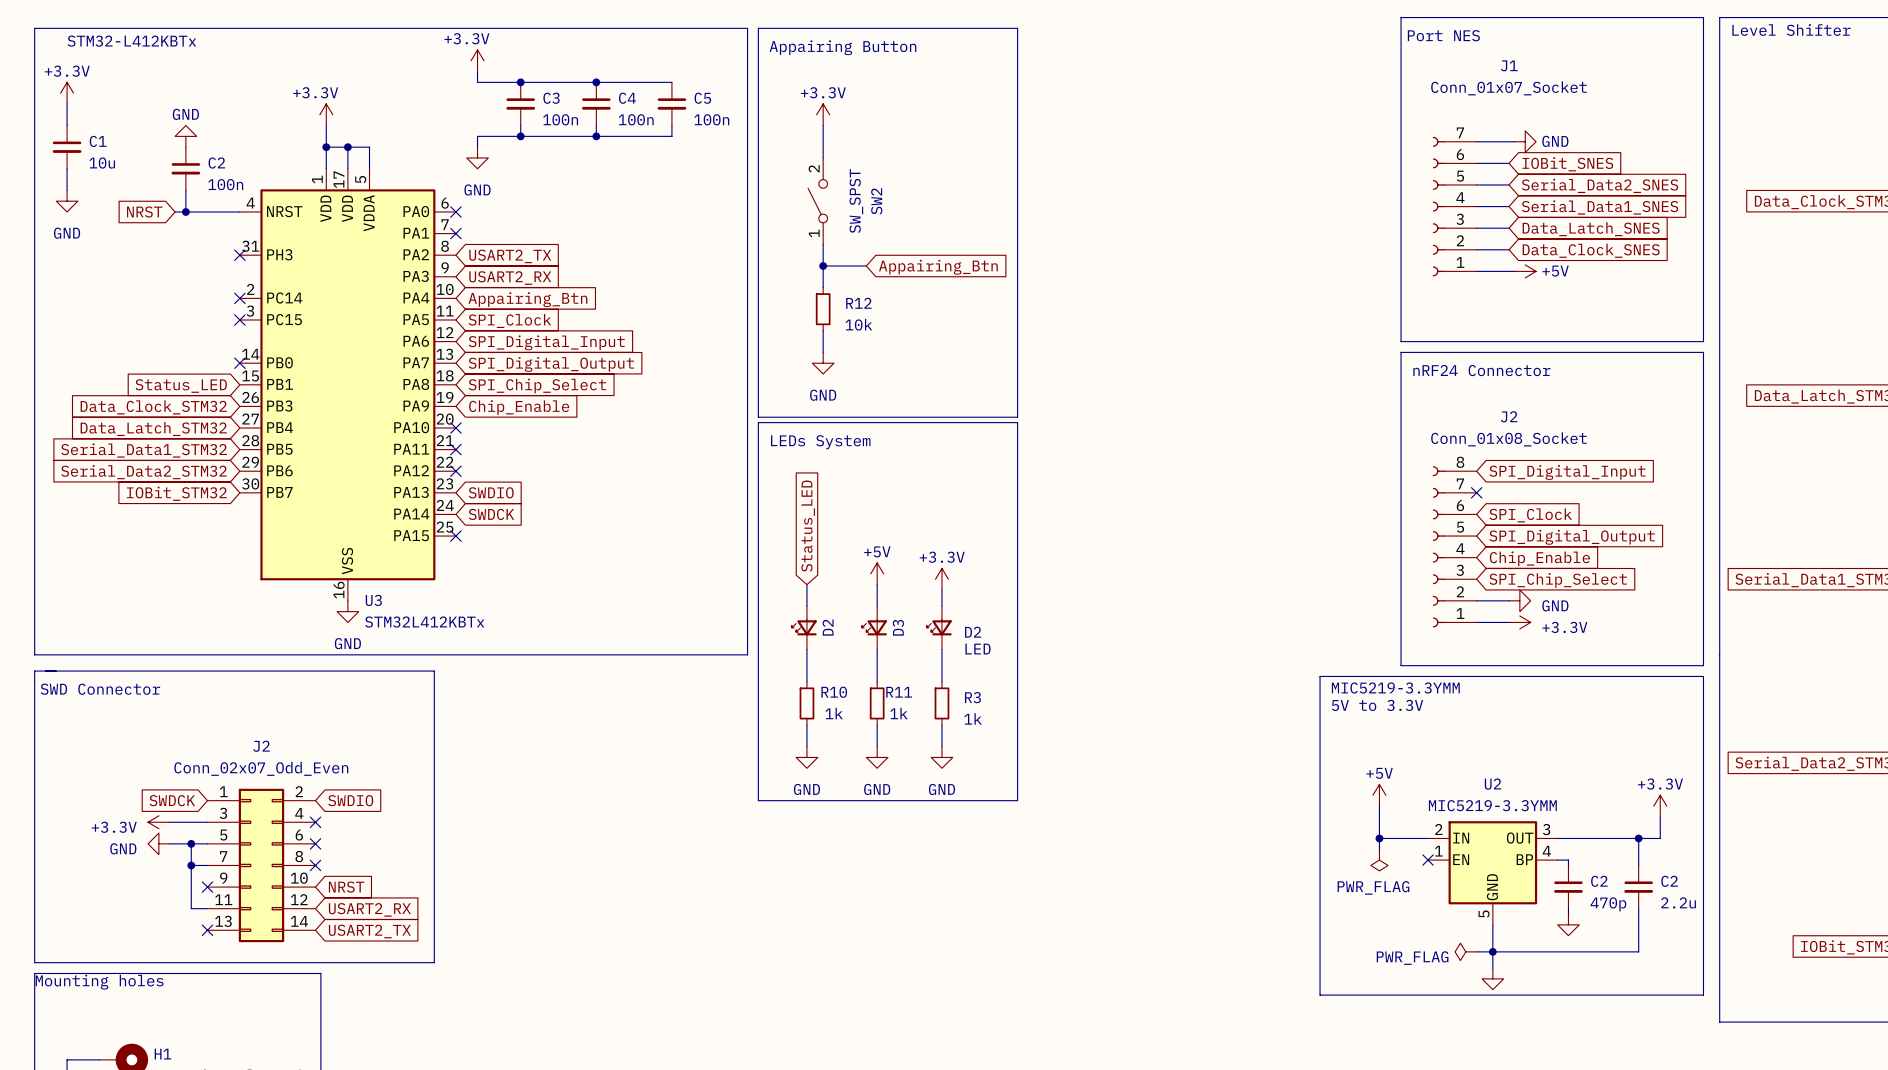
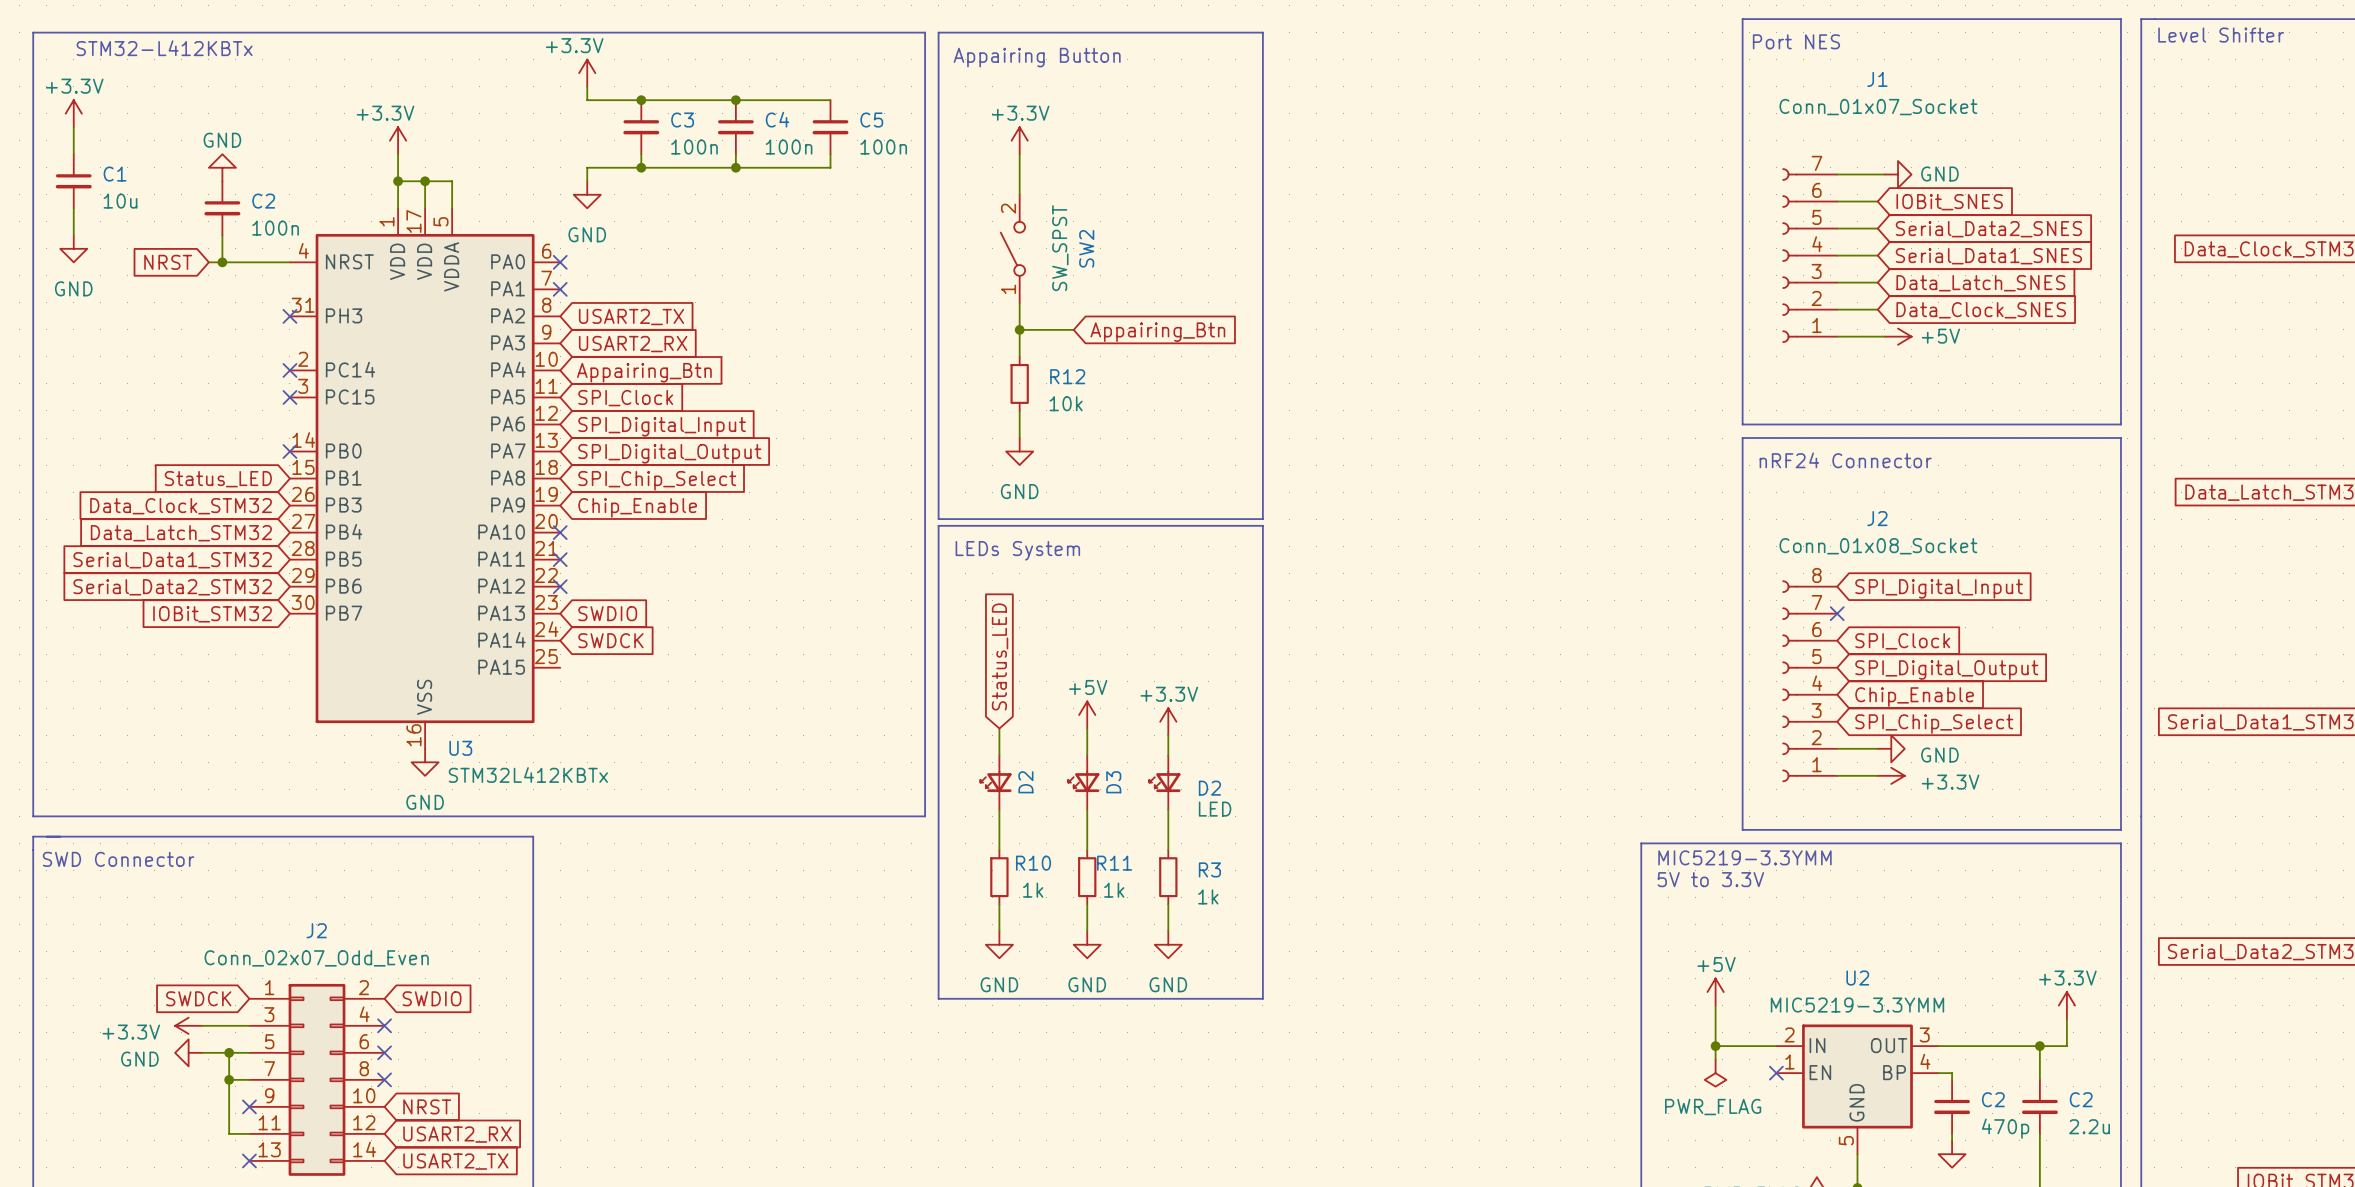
no-connect mark: (455, 536) -> none

